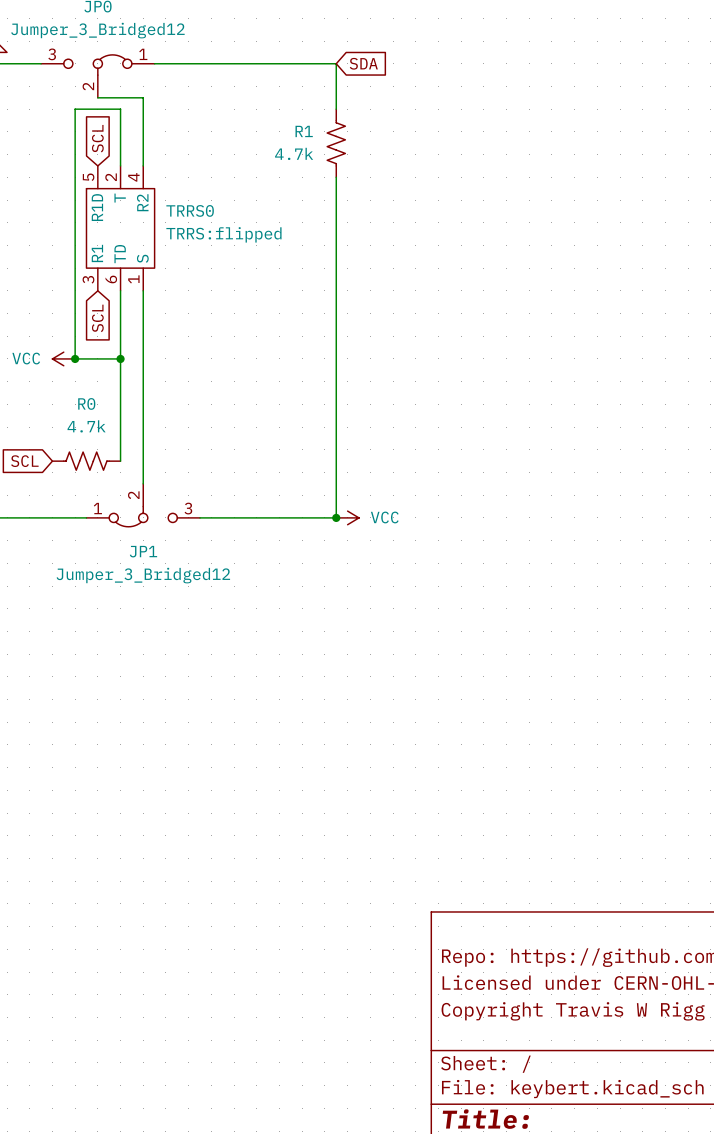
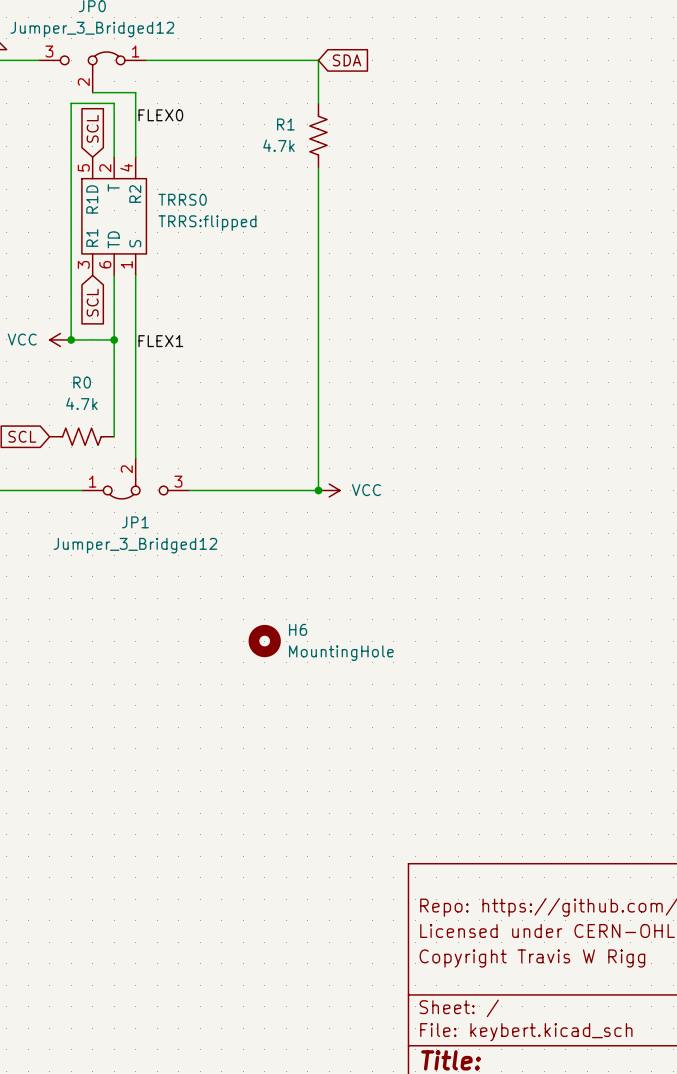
label: none -> FLEX0 (160, 115)
label: none -> FLEX1 (160, 341)
H6: none -> MountingHole (264, 641)

